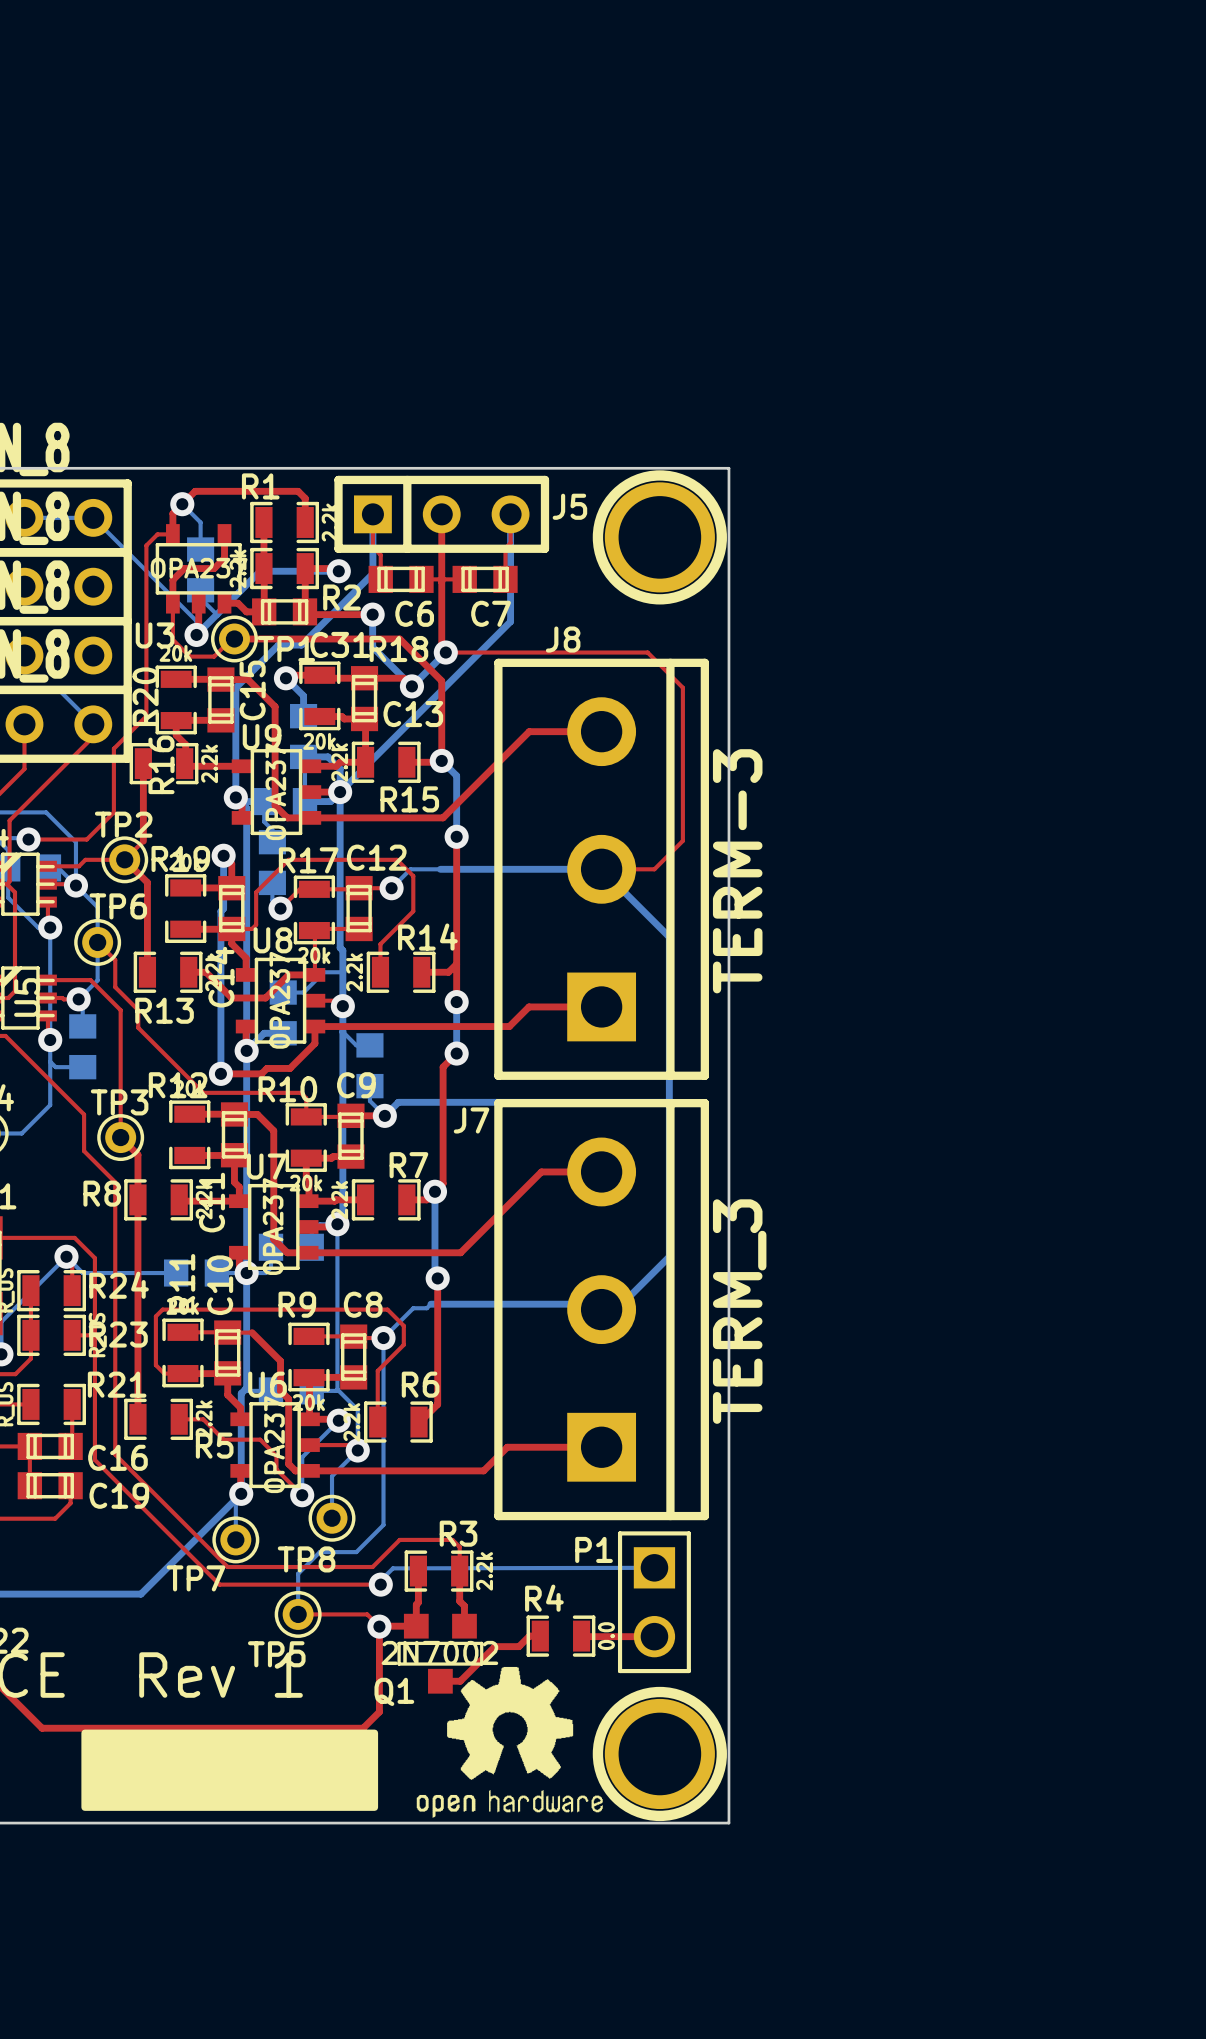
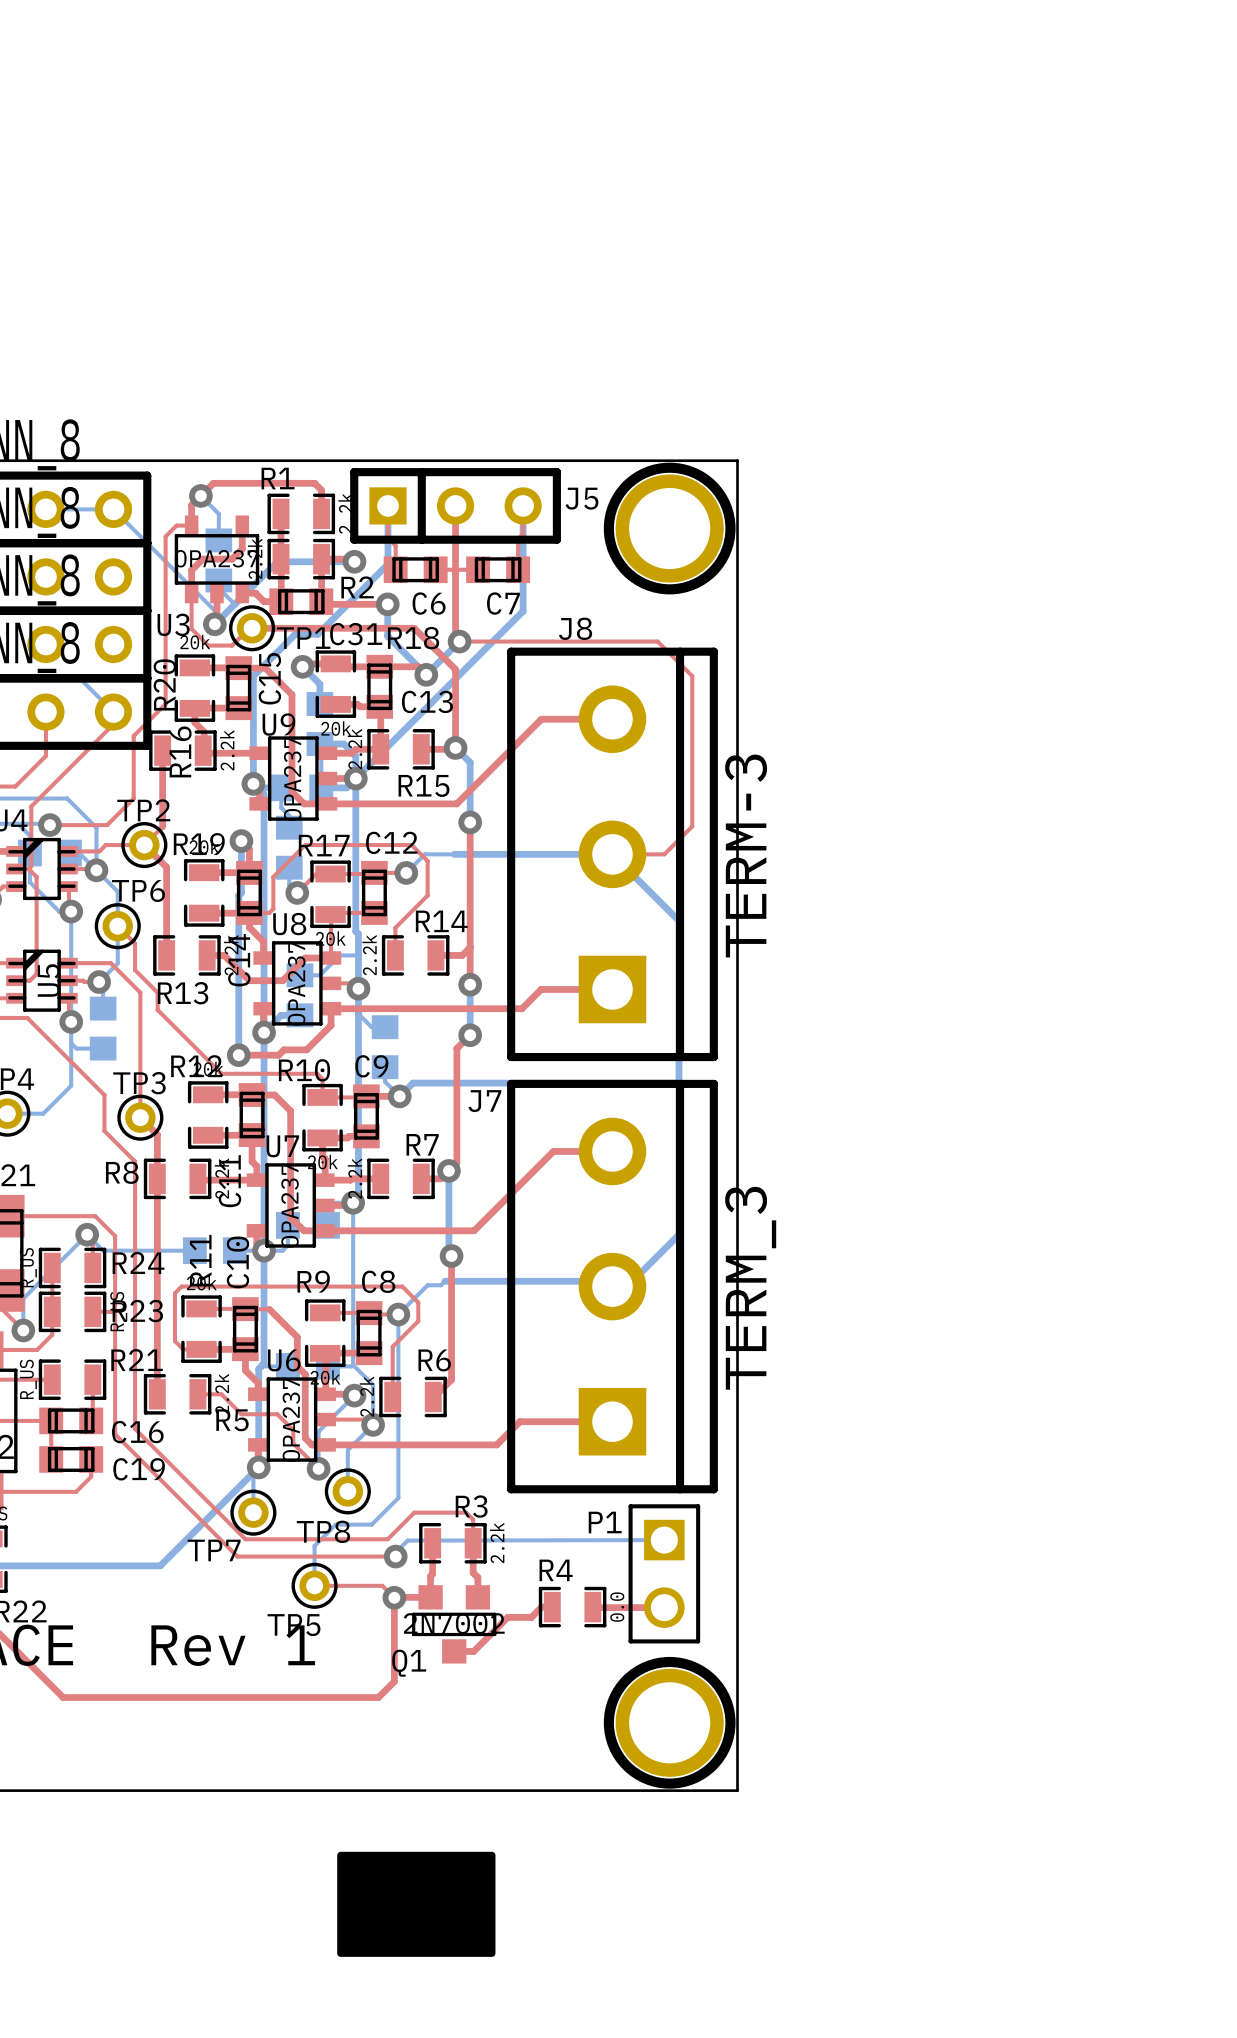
drawing: [416, 1666, 603, 1818] -> none
drawing: [81, 1729, 379, 1811] -> none
drawing: none -> [337, 1851, 496, 1957]

